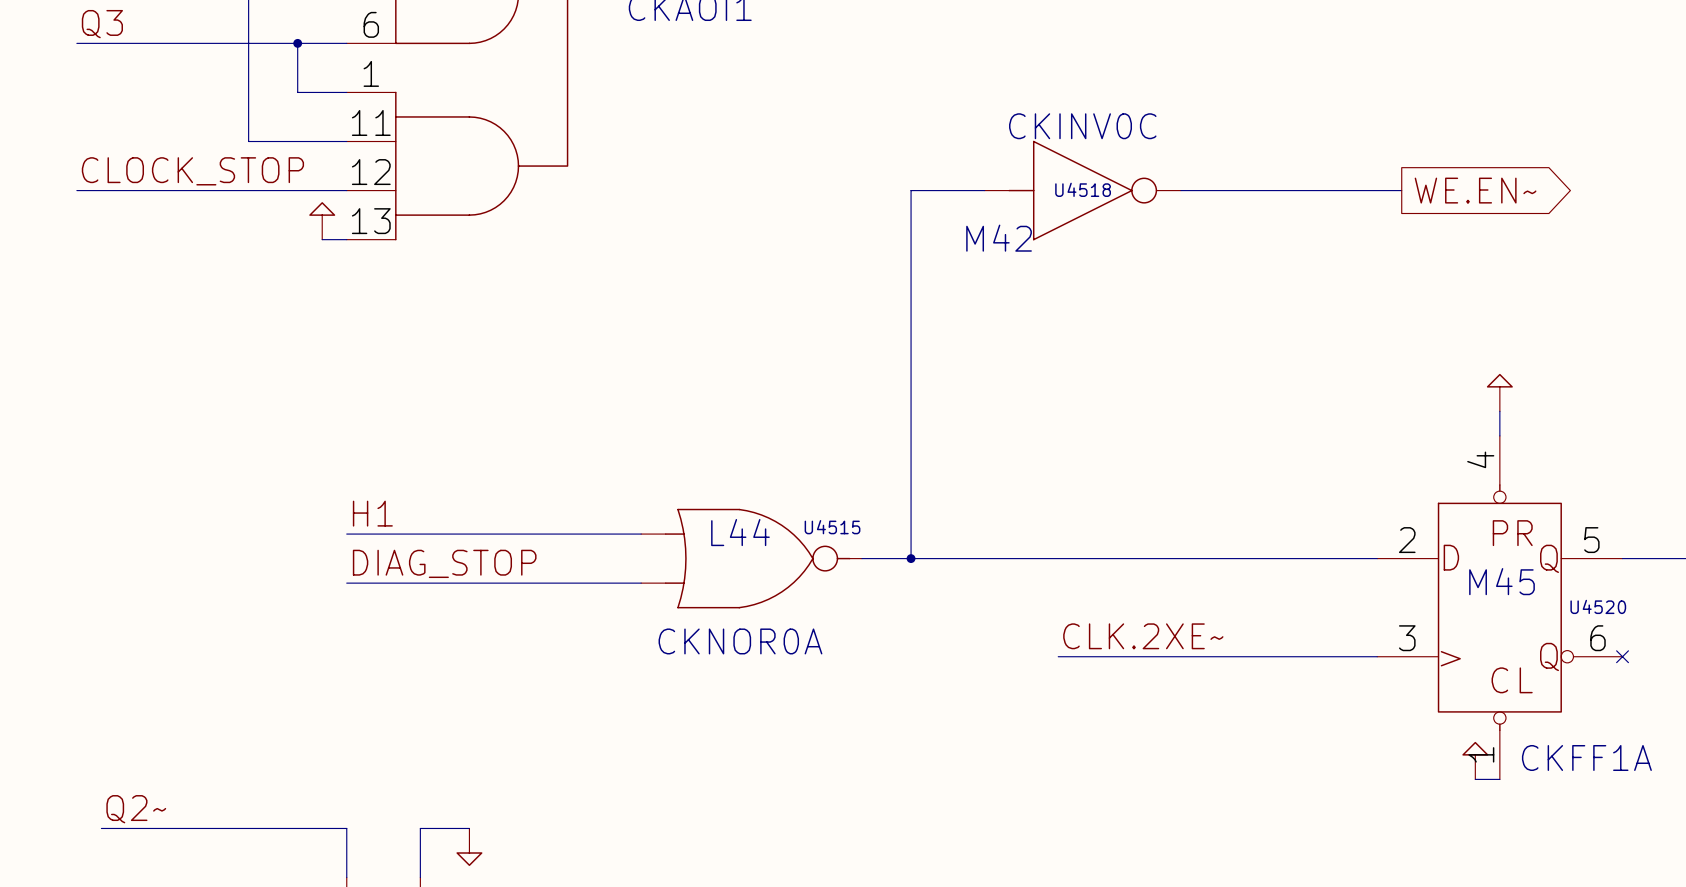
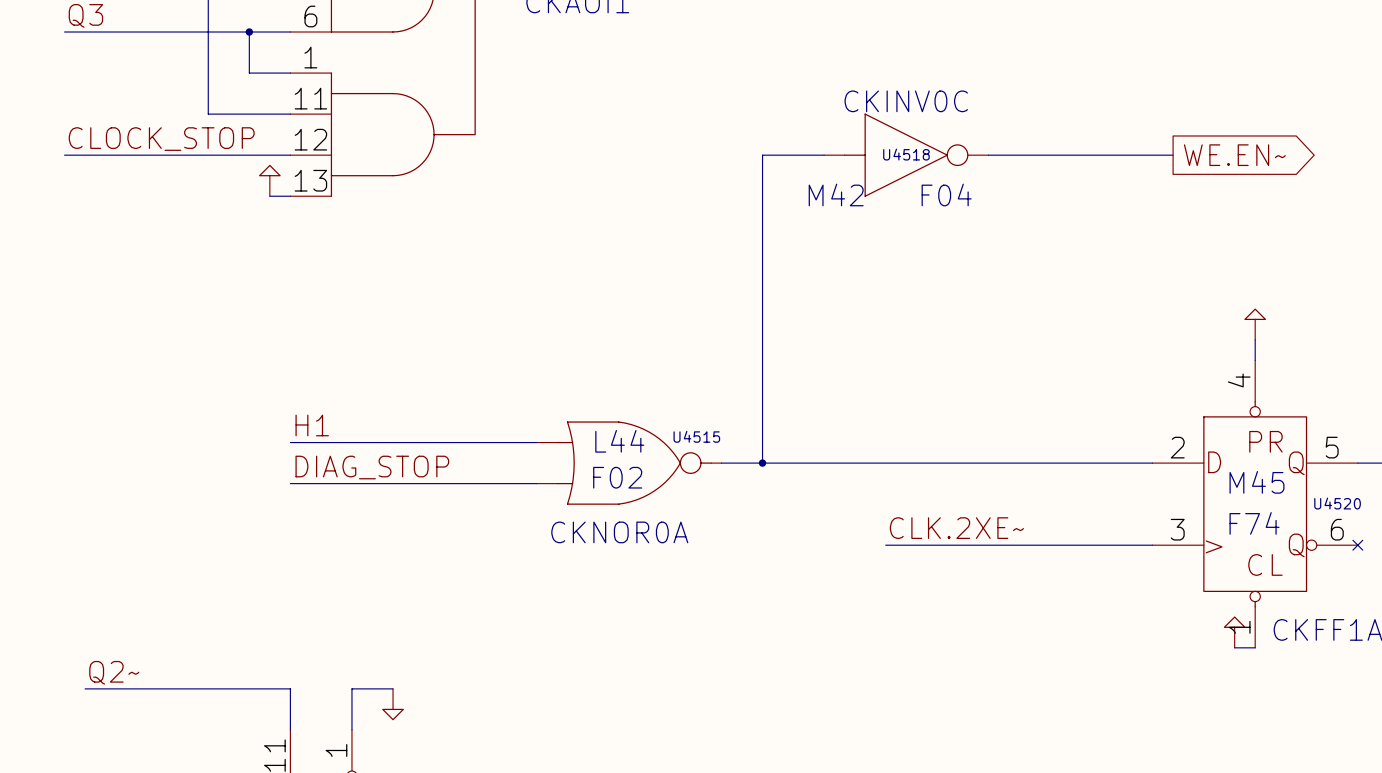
U4518 value: none -> F04 (946, 194)
U4515 value: none -> F02 (617, 477)
U4520 value: none -> F74 (1254, 523)

